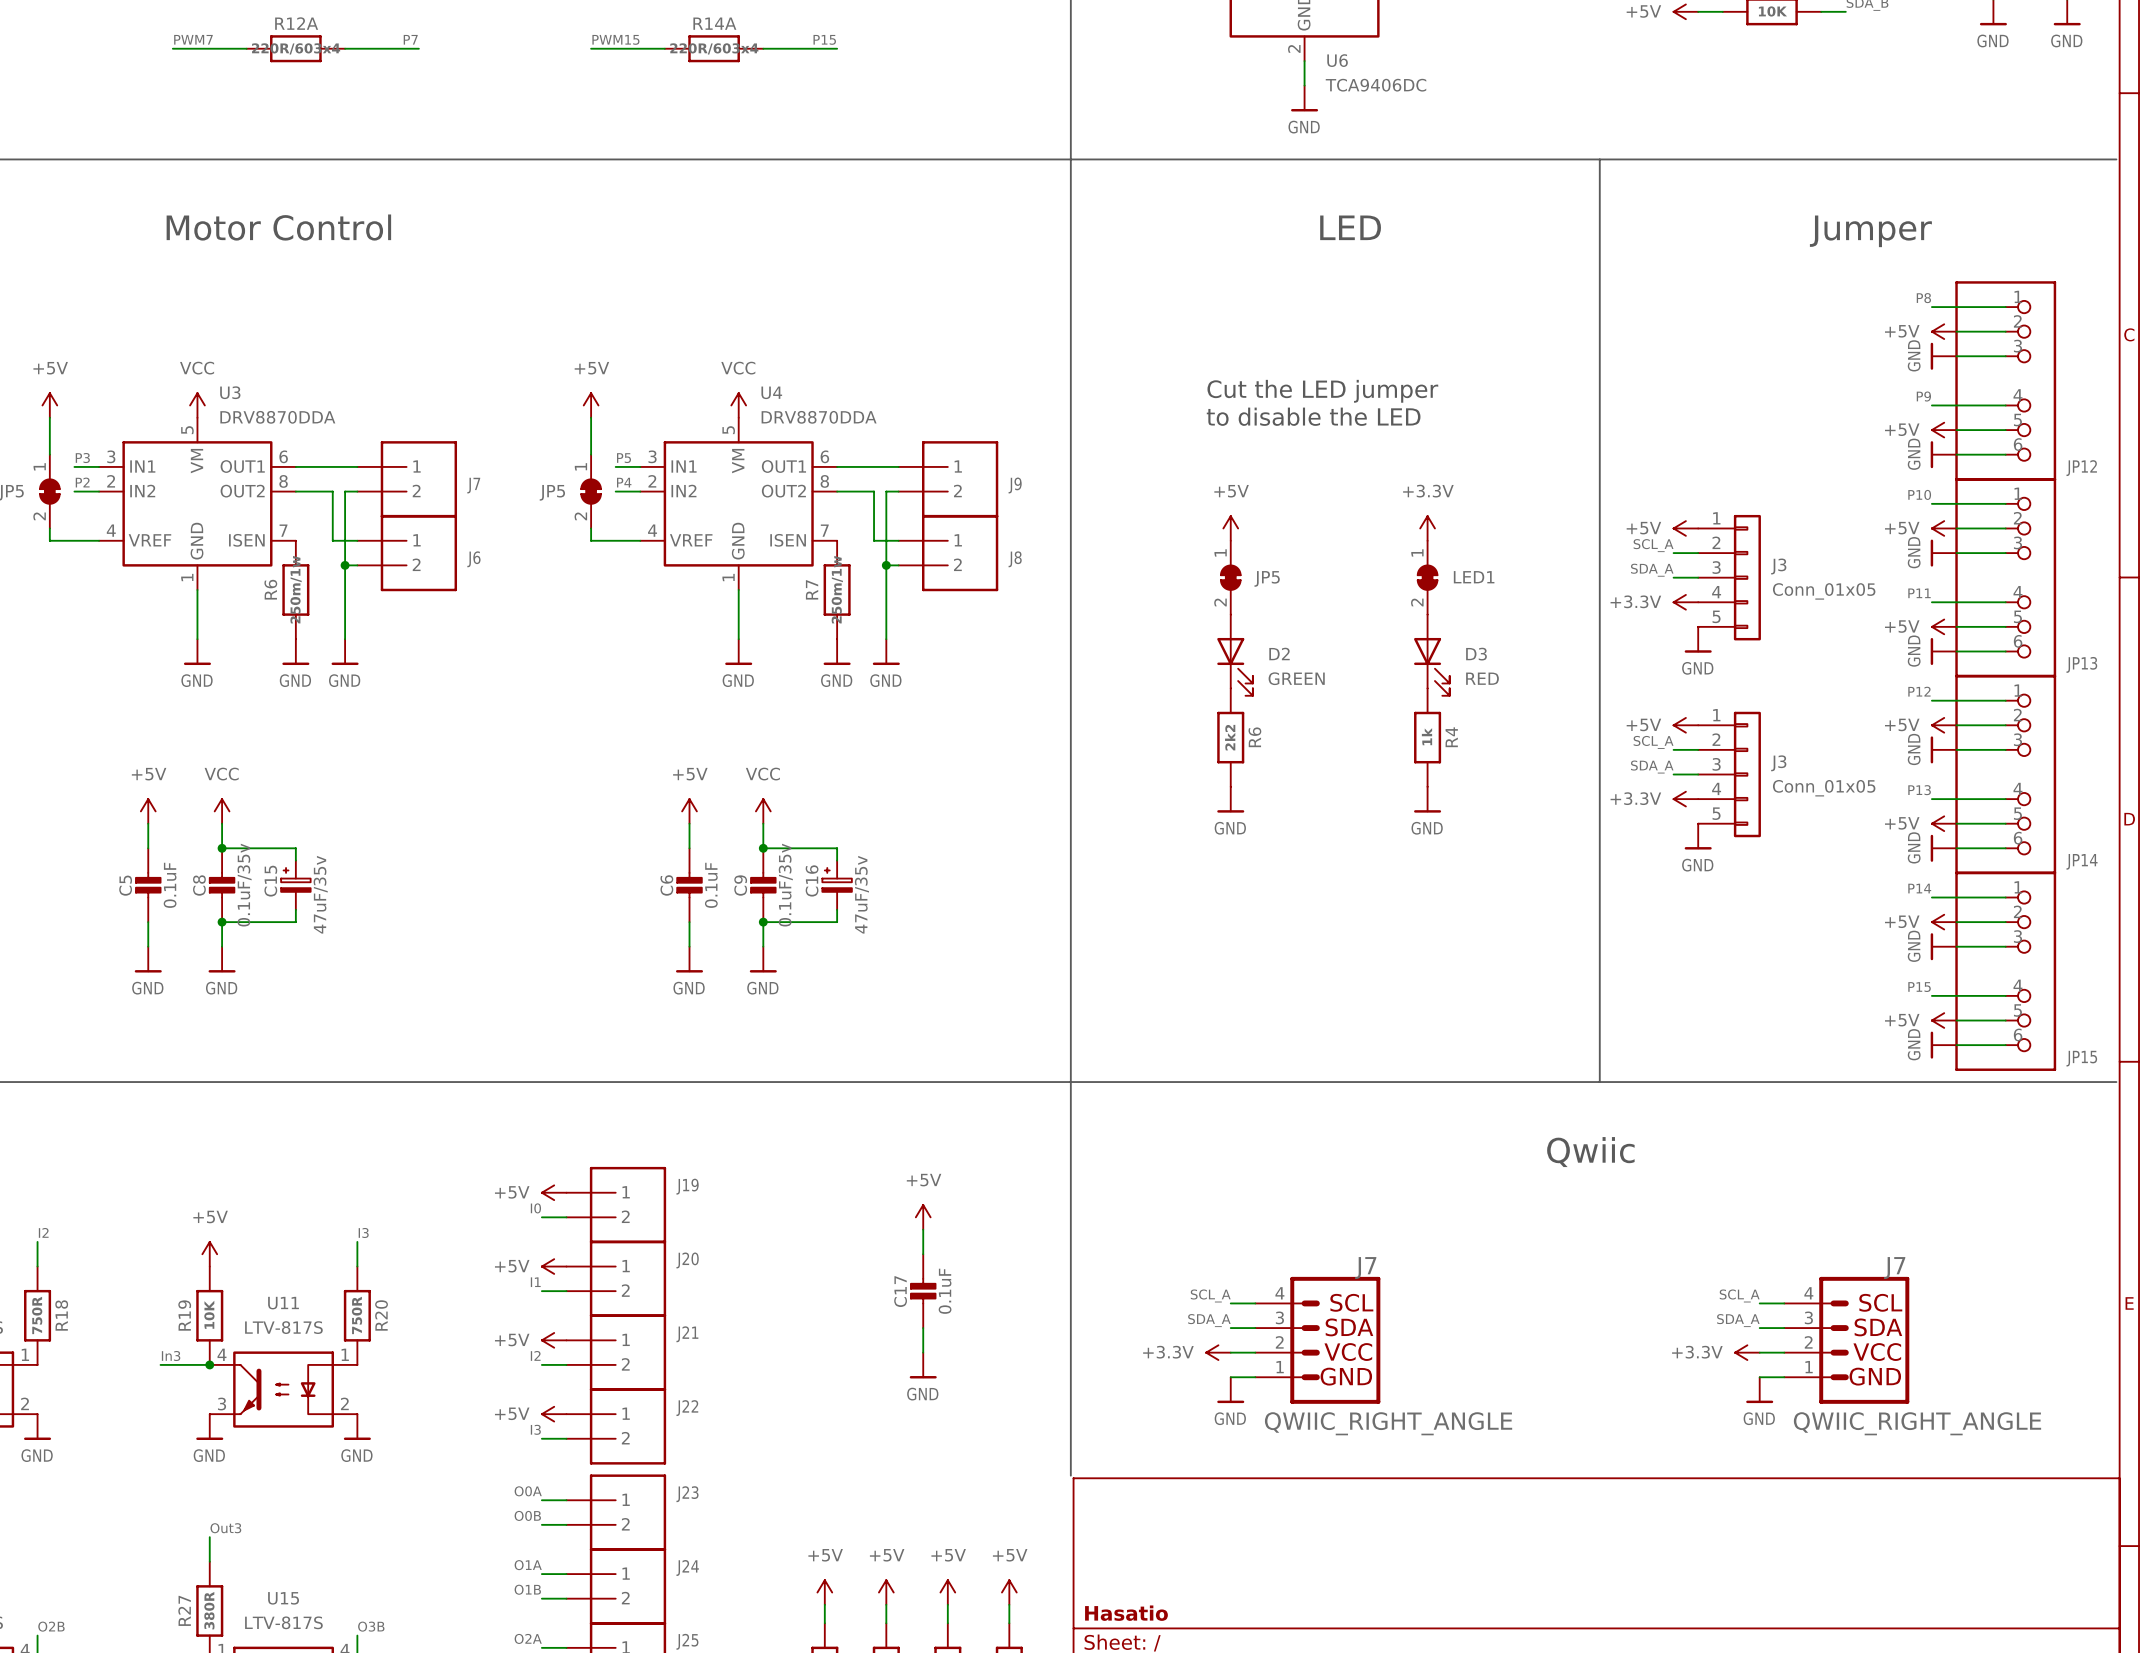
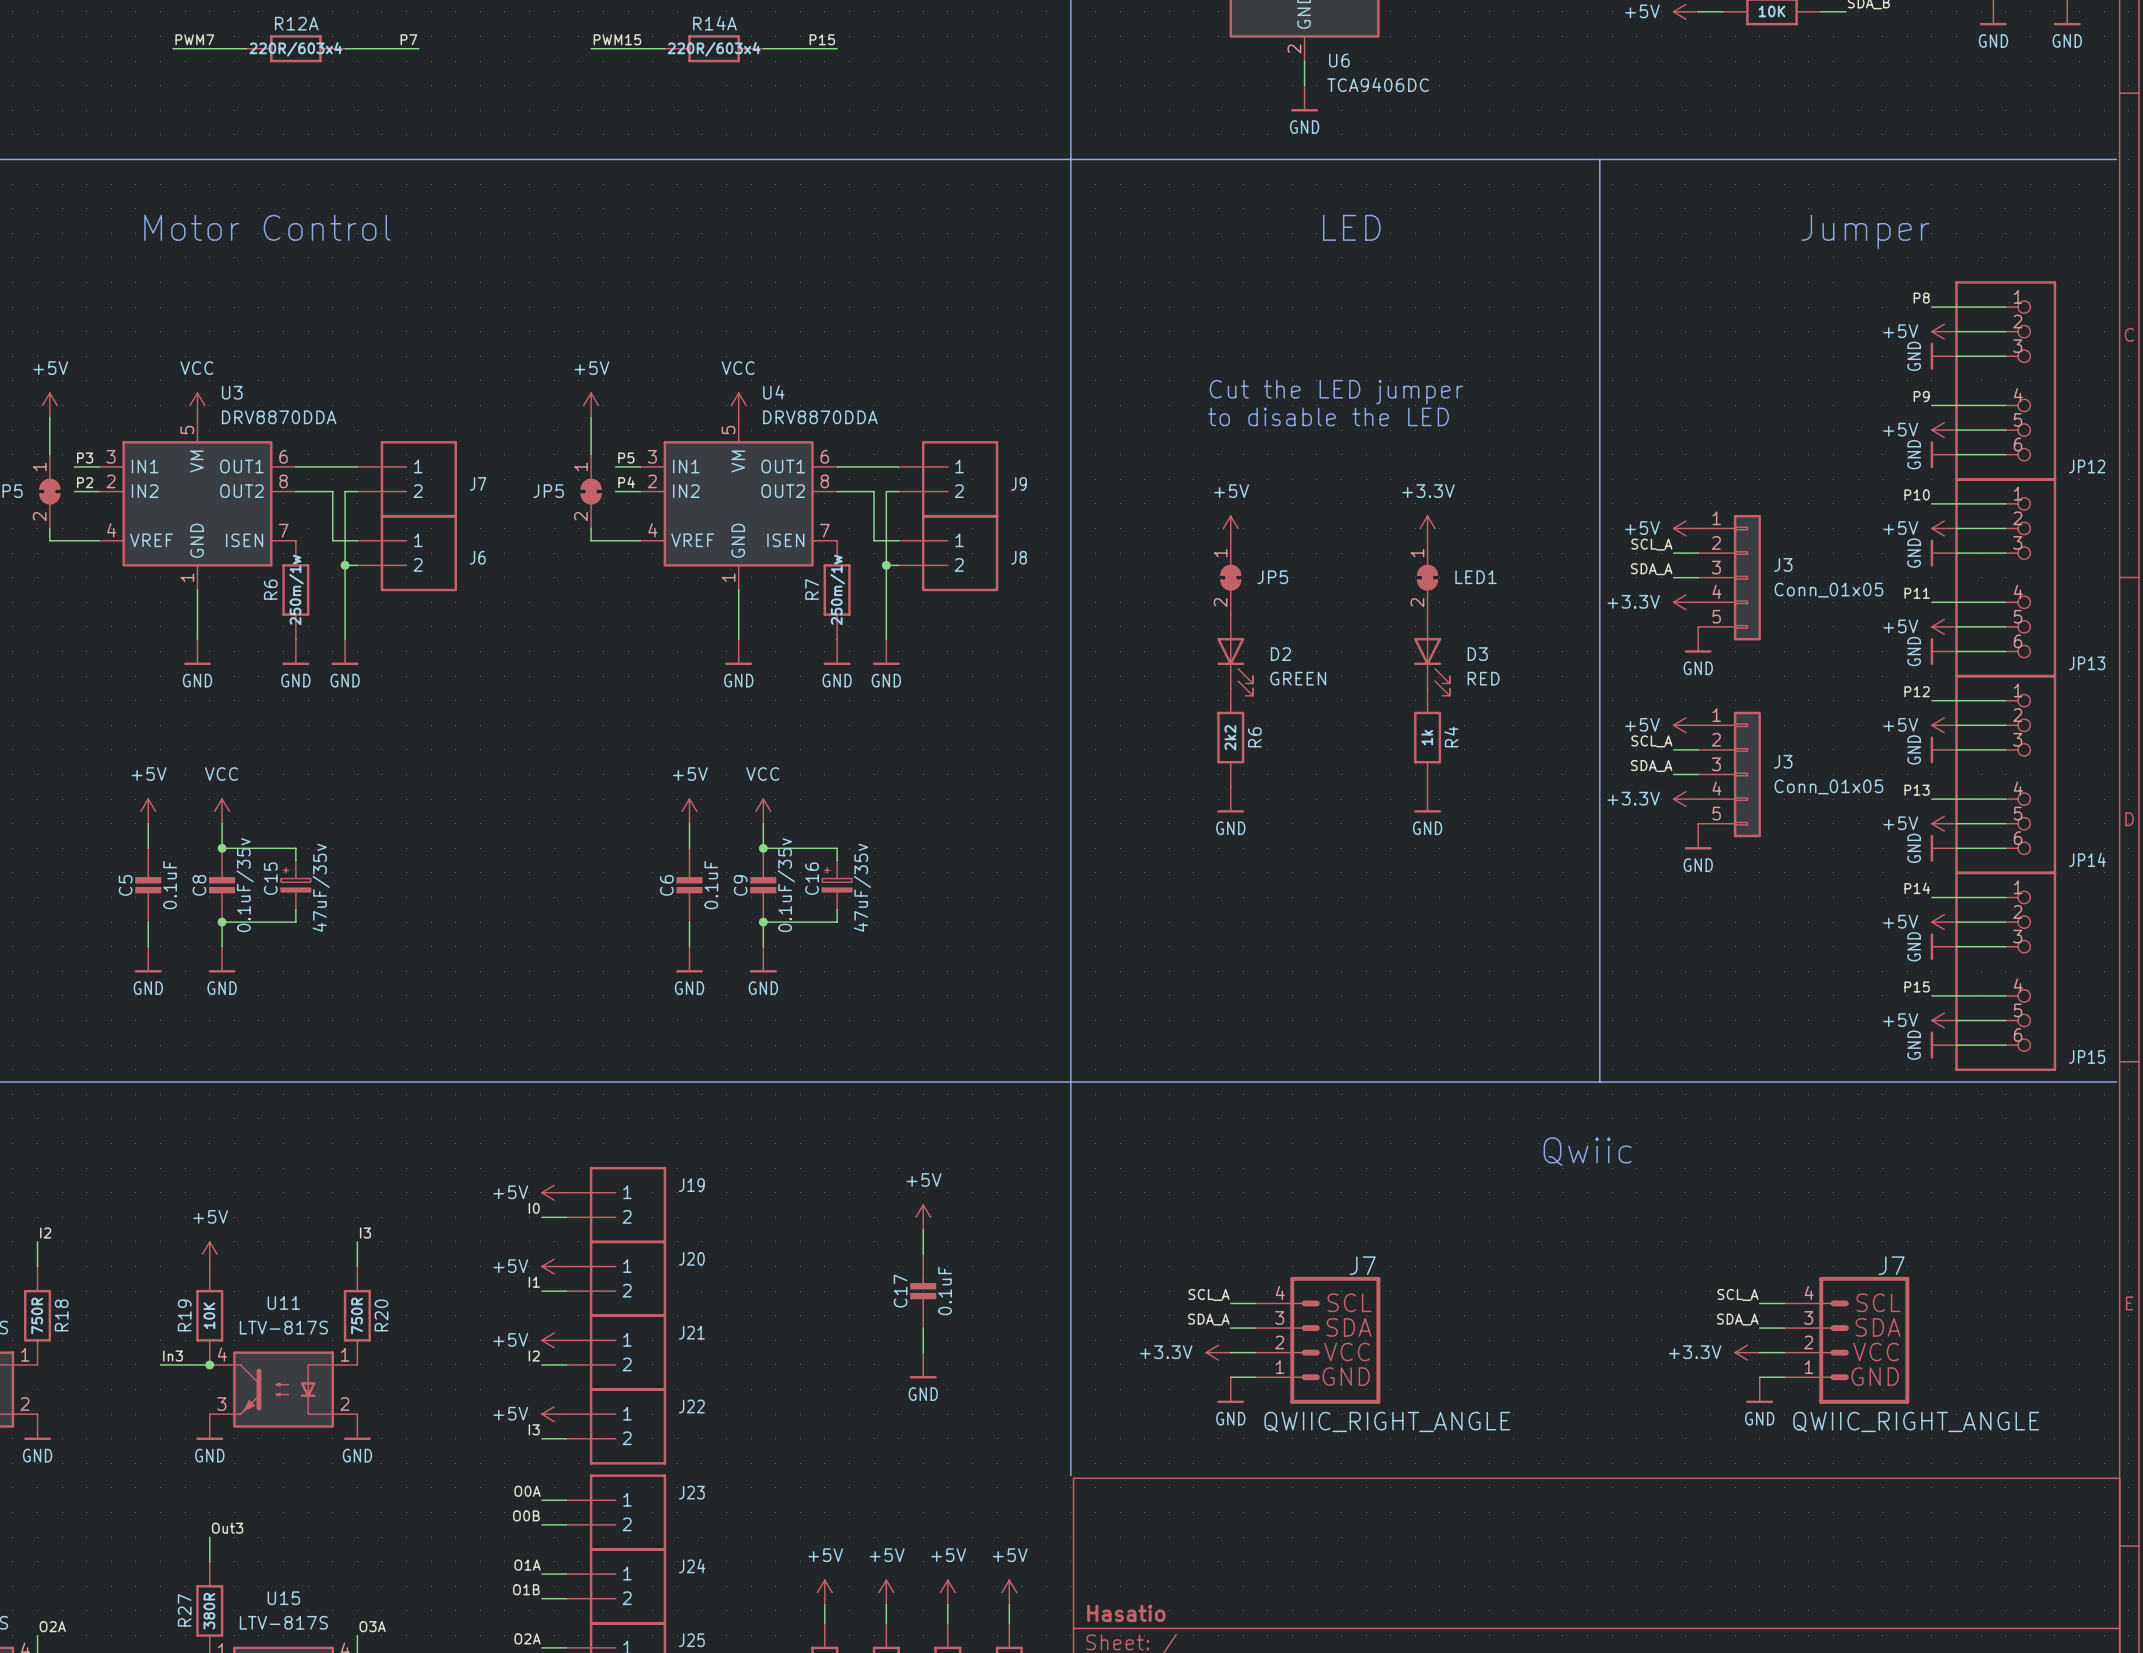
label: O2B (51, 1626) -> O2A (52, 1626)
label: O3B (371, 1626) -> O3A (372, 1626)

